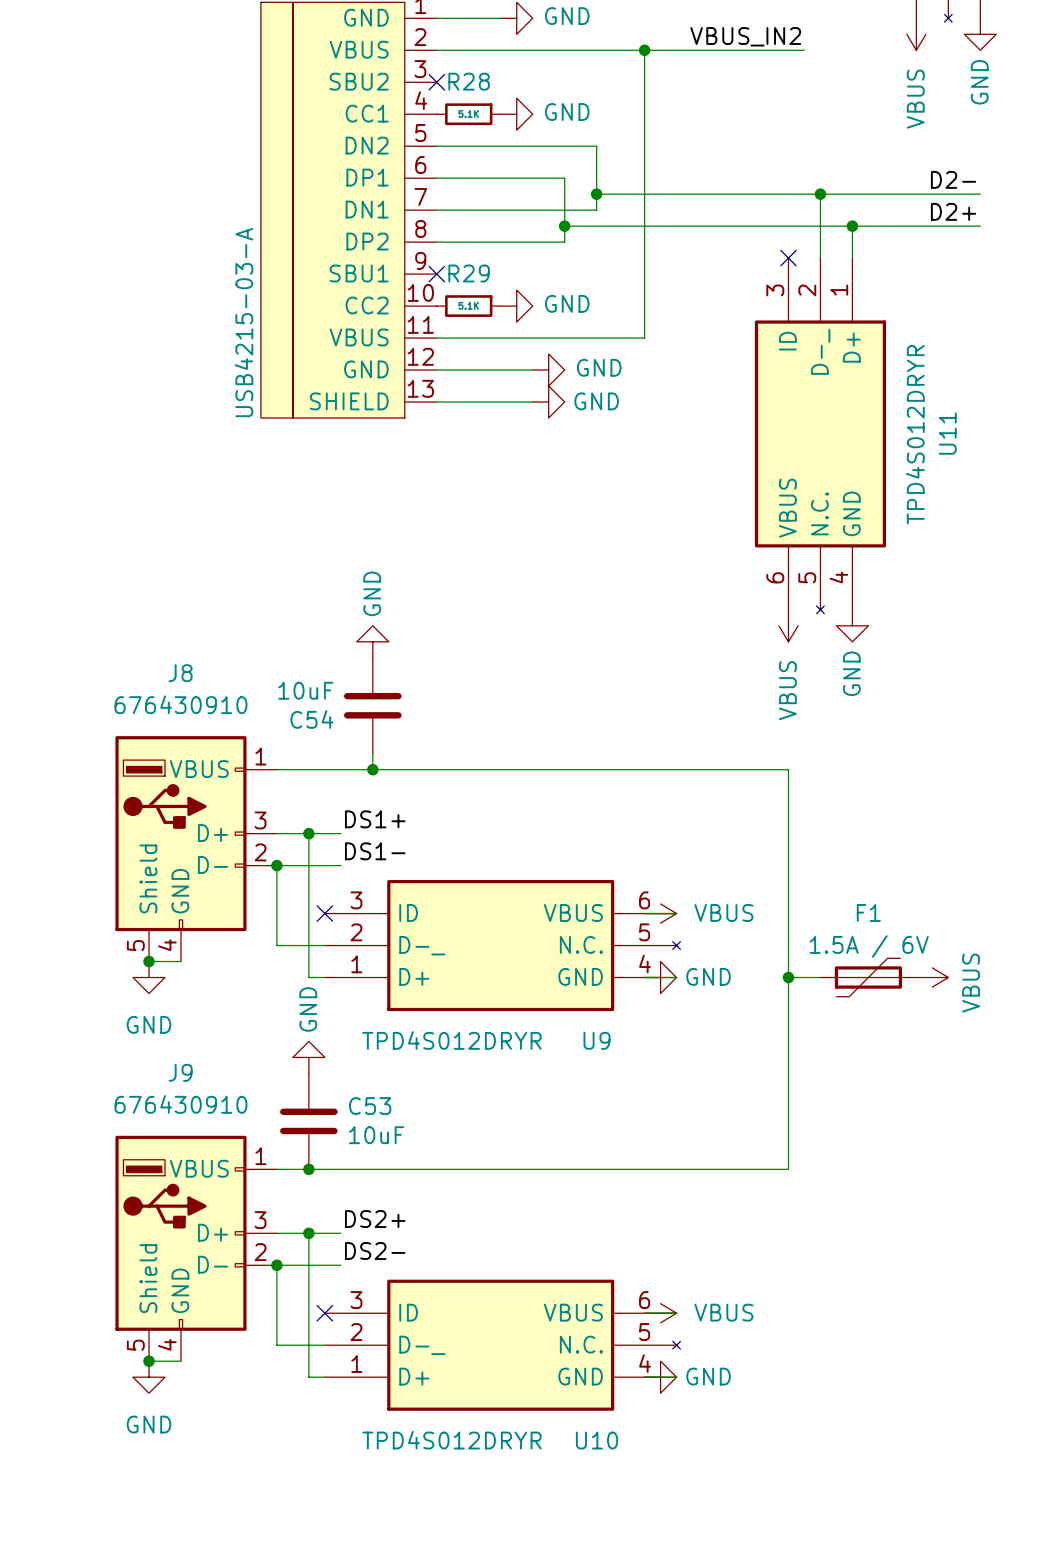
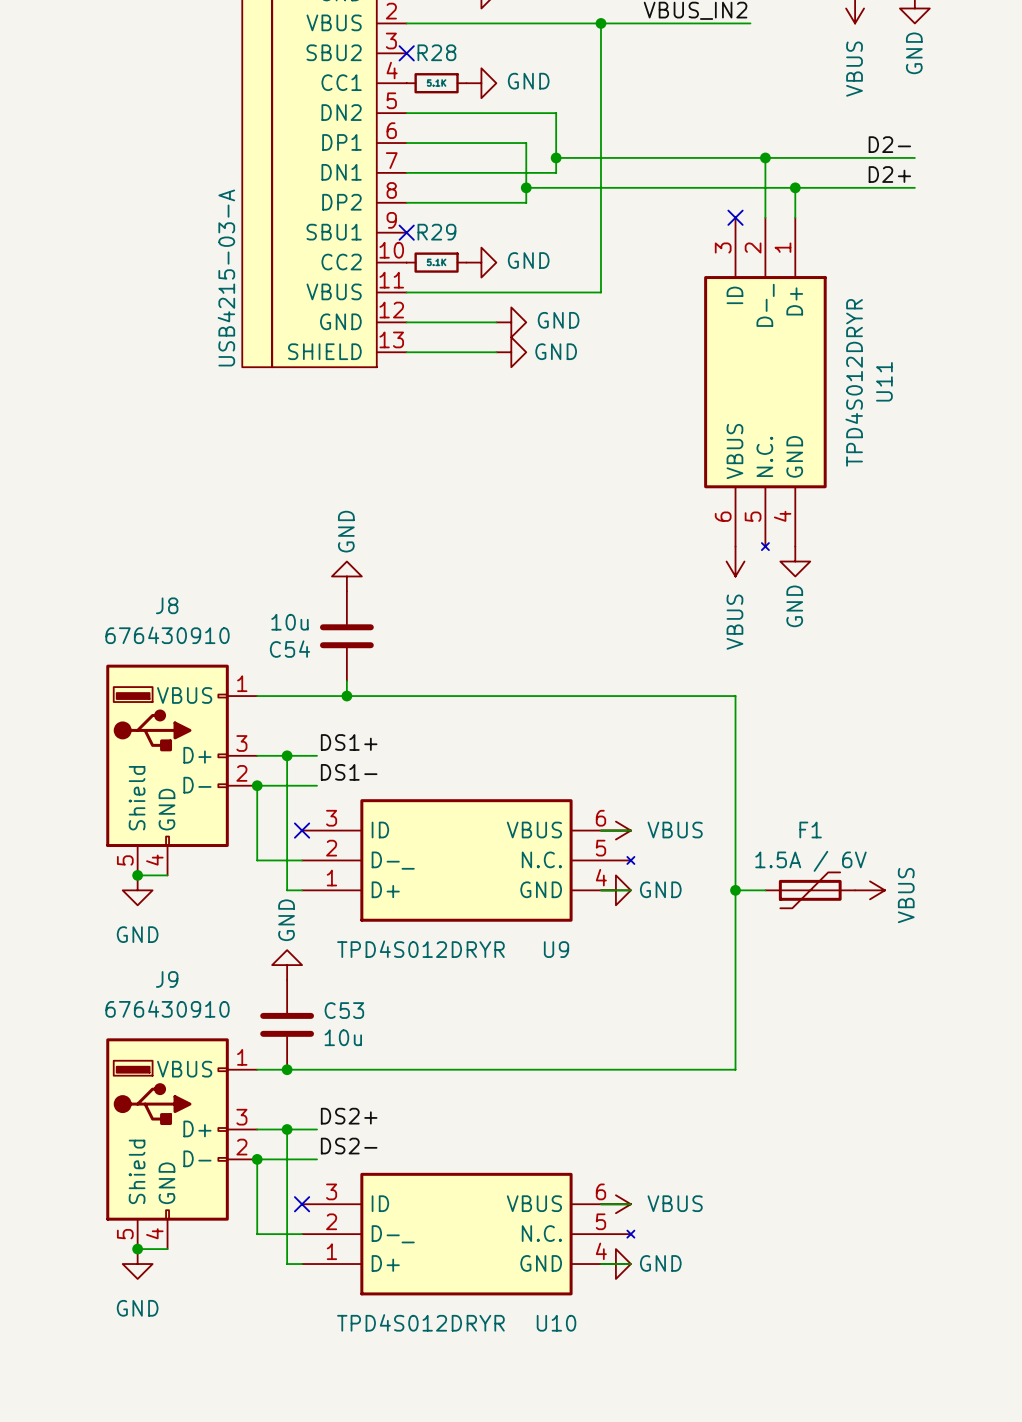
C54 value: 10uF (305, 690) -> 10u (289, 622)
C53 value: 10uF (376, 1135) -> 10u (343, 1037)

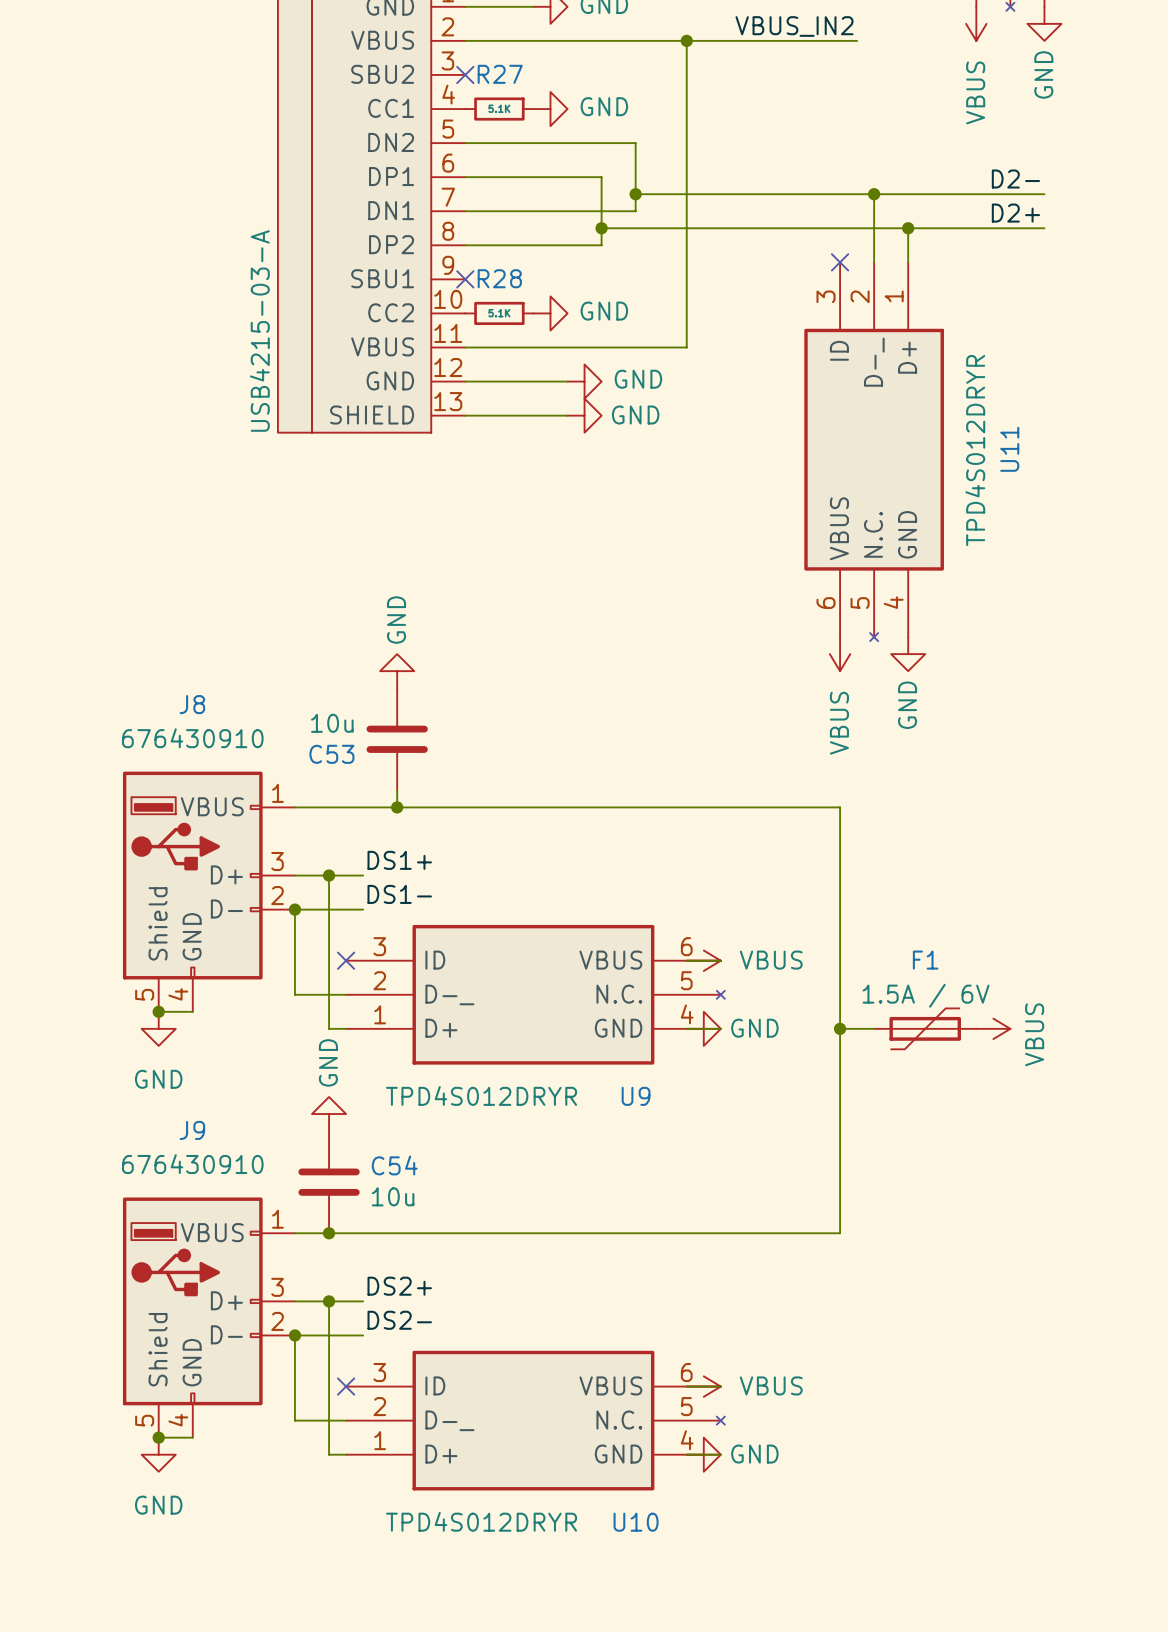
R28 name: R28 (436, 52) -> R27 (500, 74)
R29 name: R29 (436, 232) -> R28 (499, 278)
C54 name: C54 (289, 649) -> C53 (331, 754)
C53 name: C53 (344, 1010) -> C54 (394, 1165)

